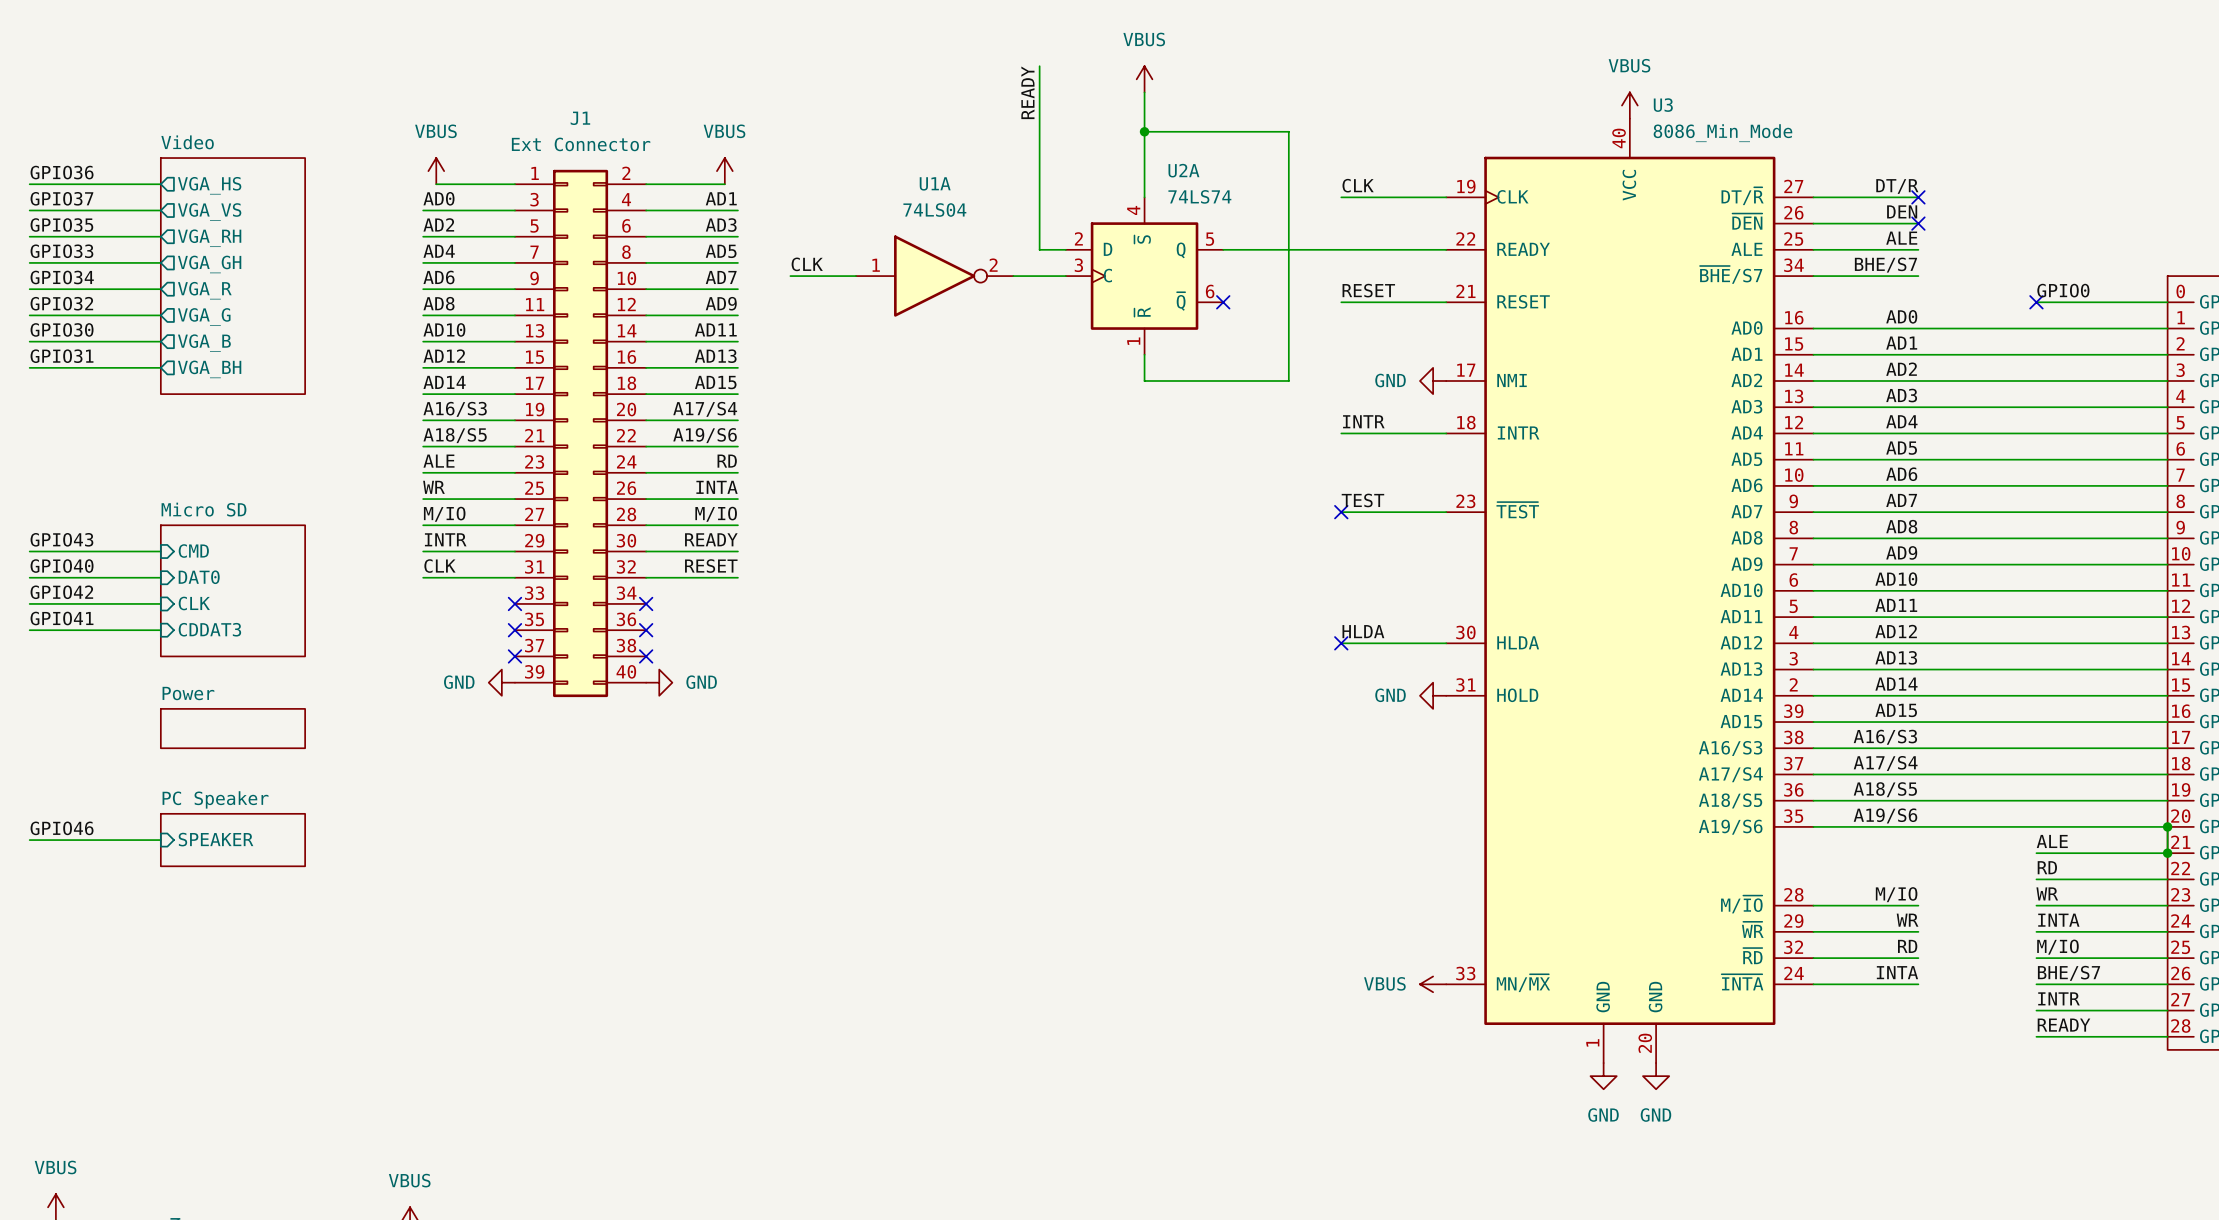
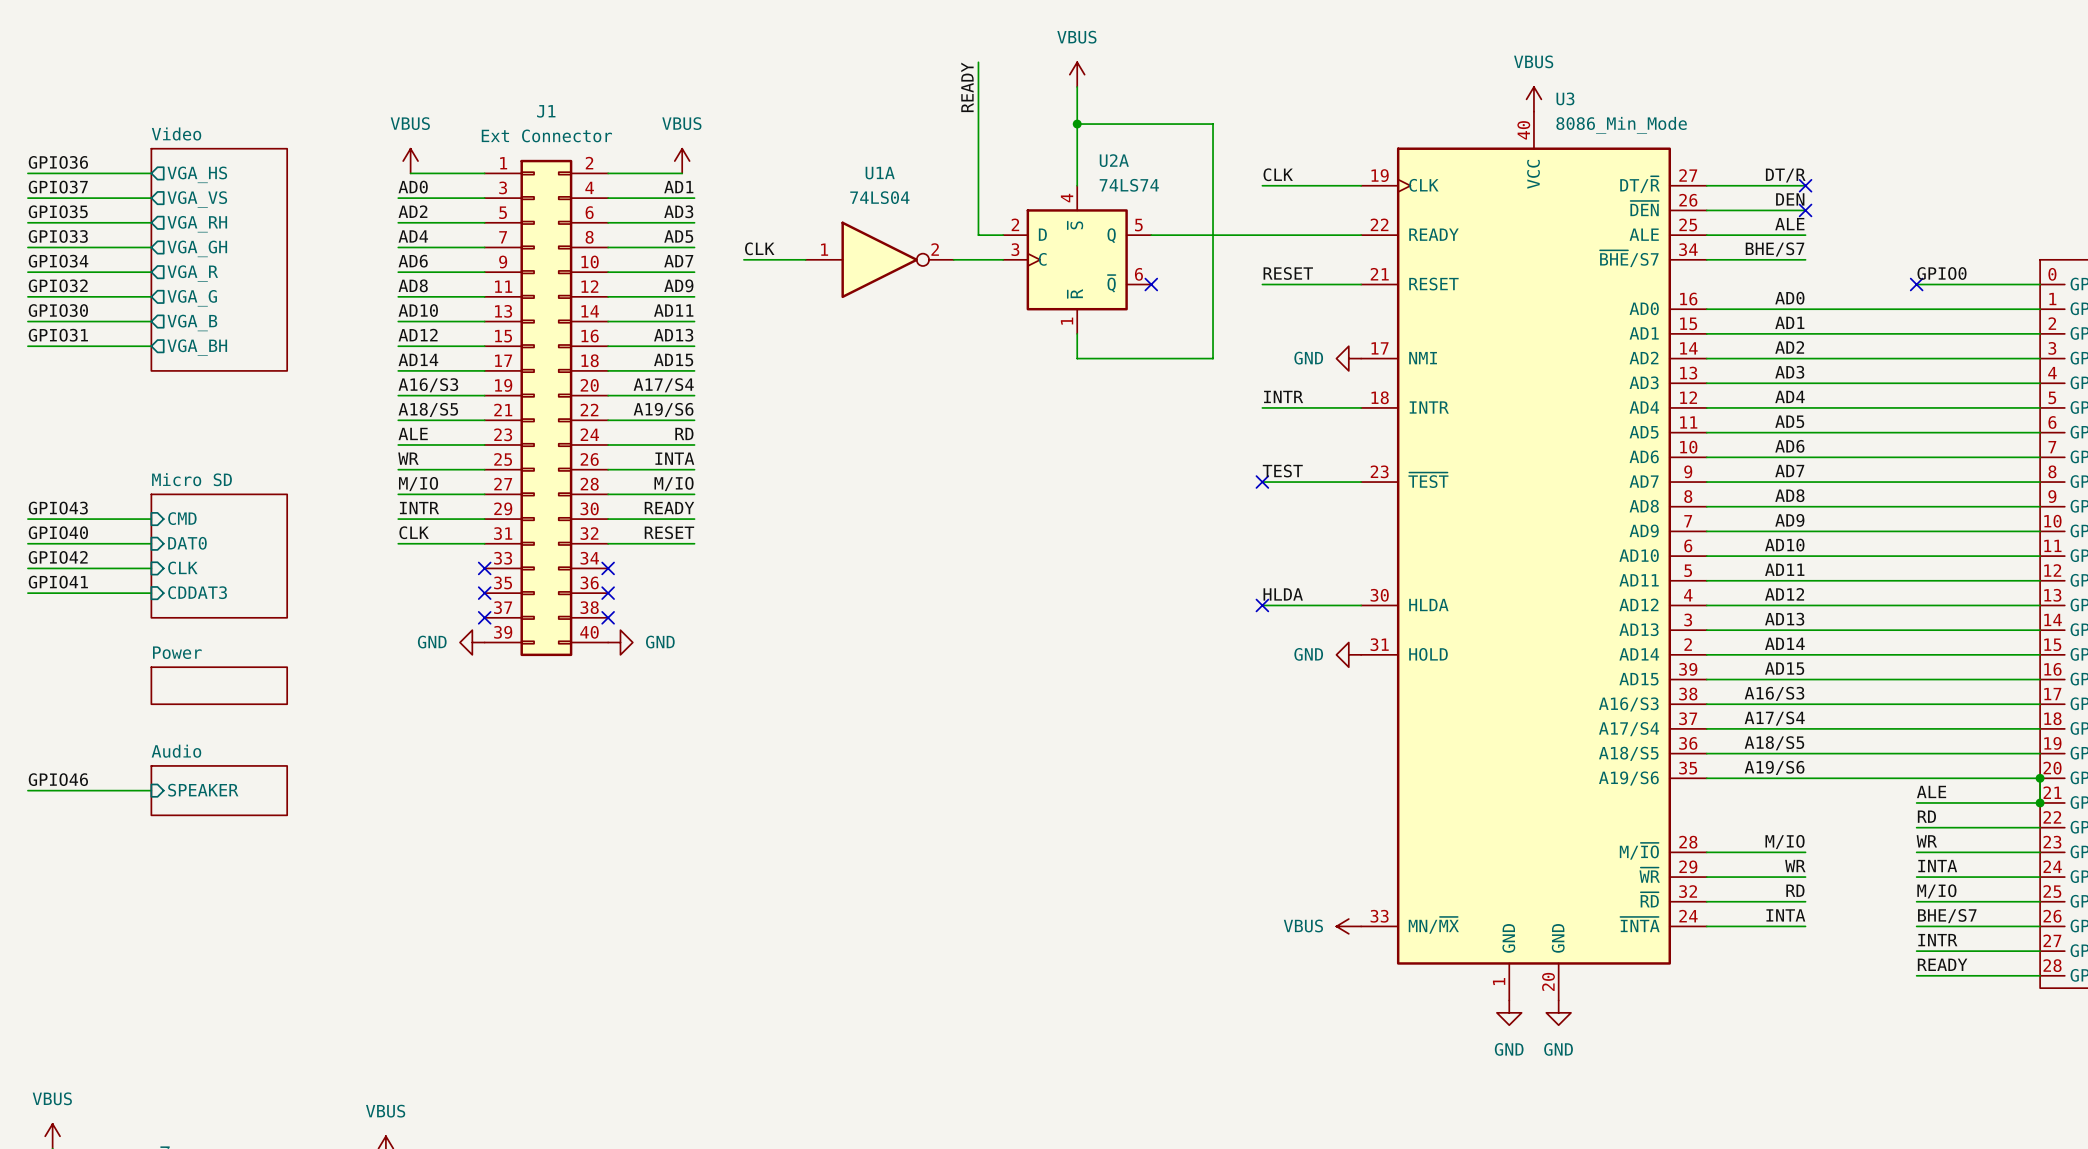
sheet PC Speaker name: PC Speaker (215, 799) -> Audio (176, 751)

